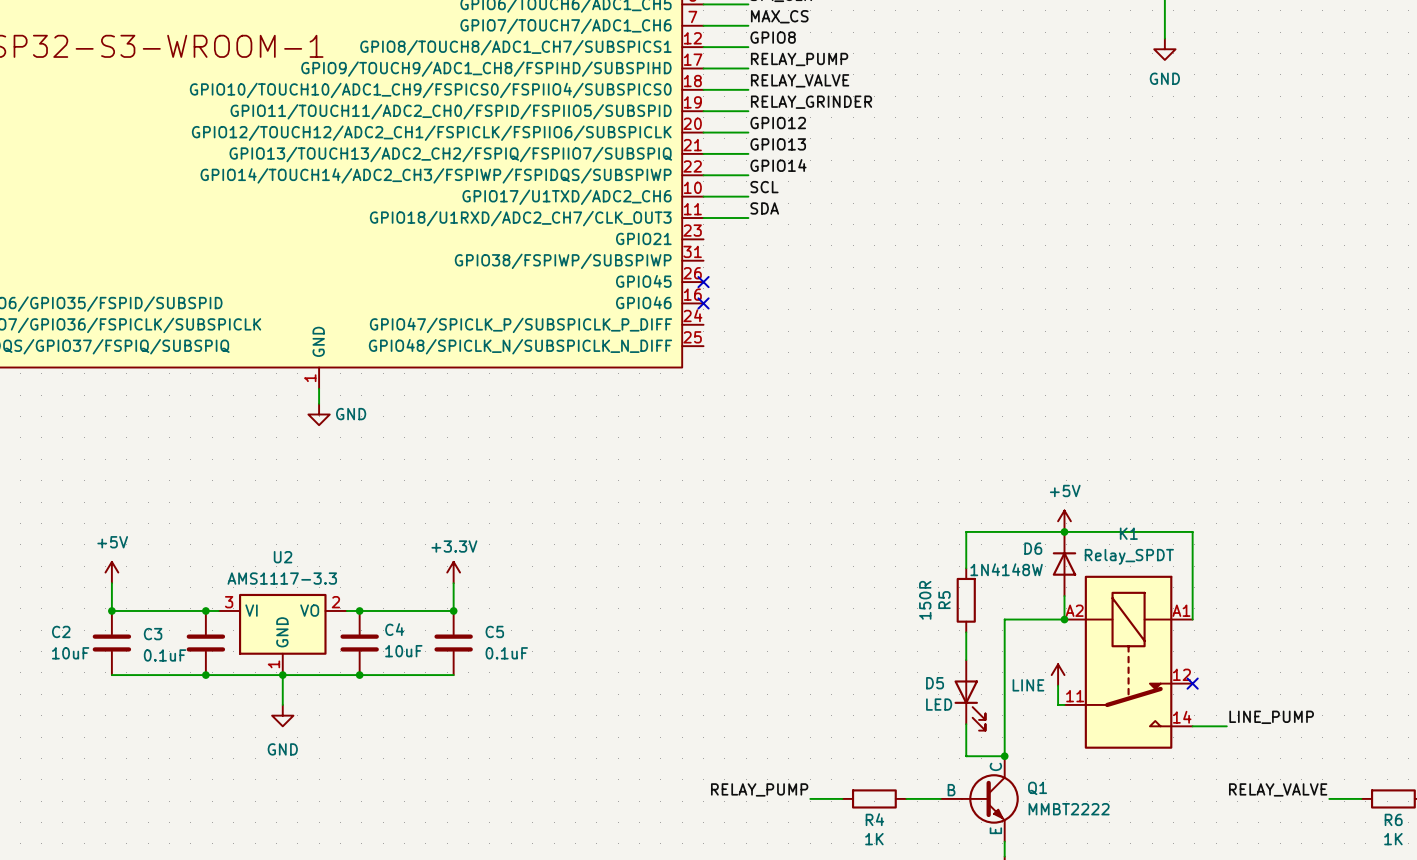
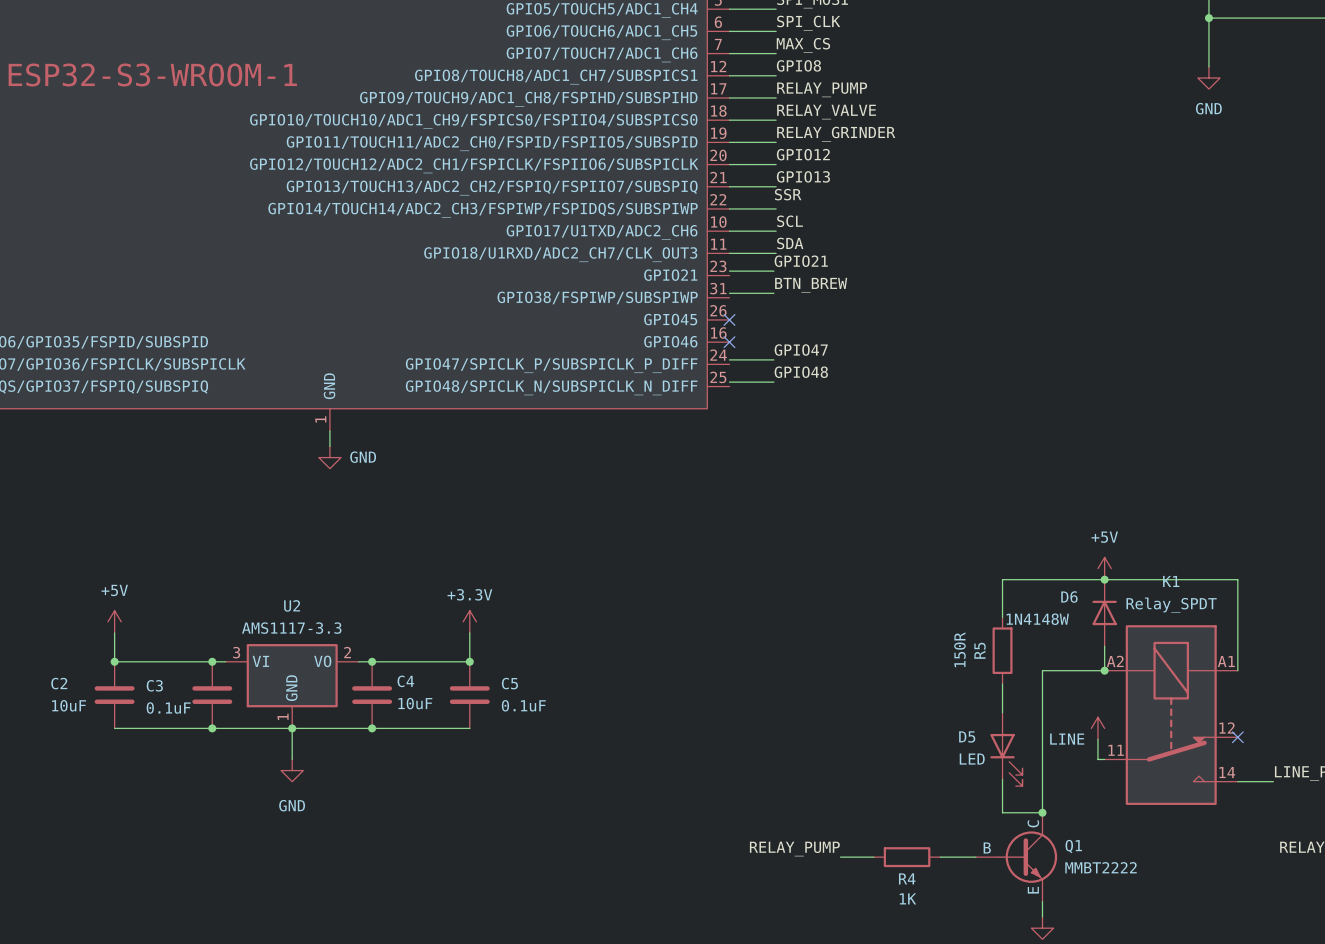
label: GPIO14 (778, 165) -> SSR (788, 194)
label: none -> GPIO21 (801, 261)
wire: none -> (729, 271) (773, 271)
label: none -> BTN_BREW (811, 285)
wire: none -> (729, 293) (773, 293)
label: none -> GPIO47 (801, 350)
wire: none -> (729, 359) (773, 359)
label: none -> GPIO48 (801, 372)
wire: none -> (729, 382) (773, 382)

